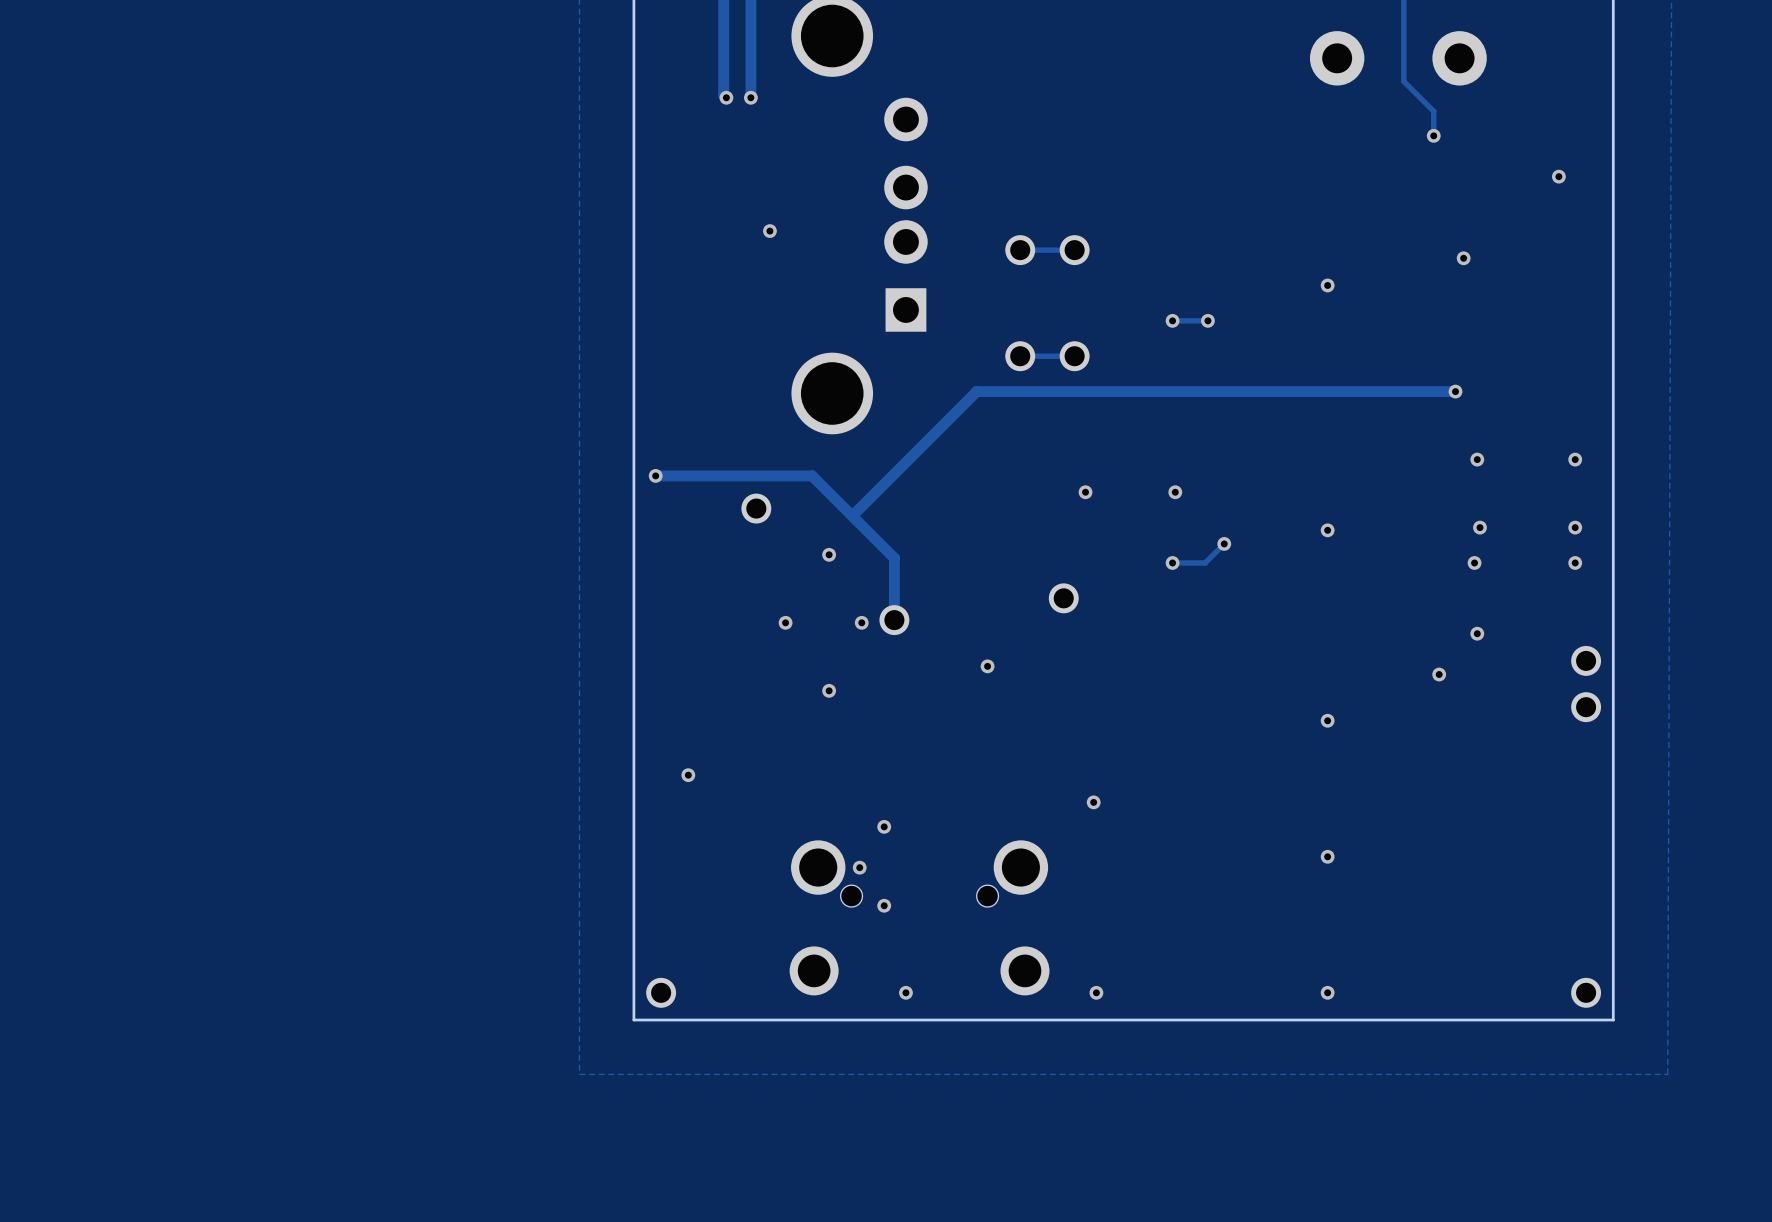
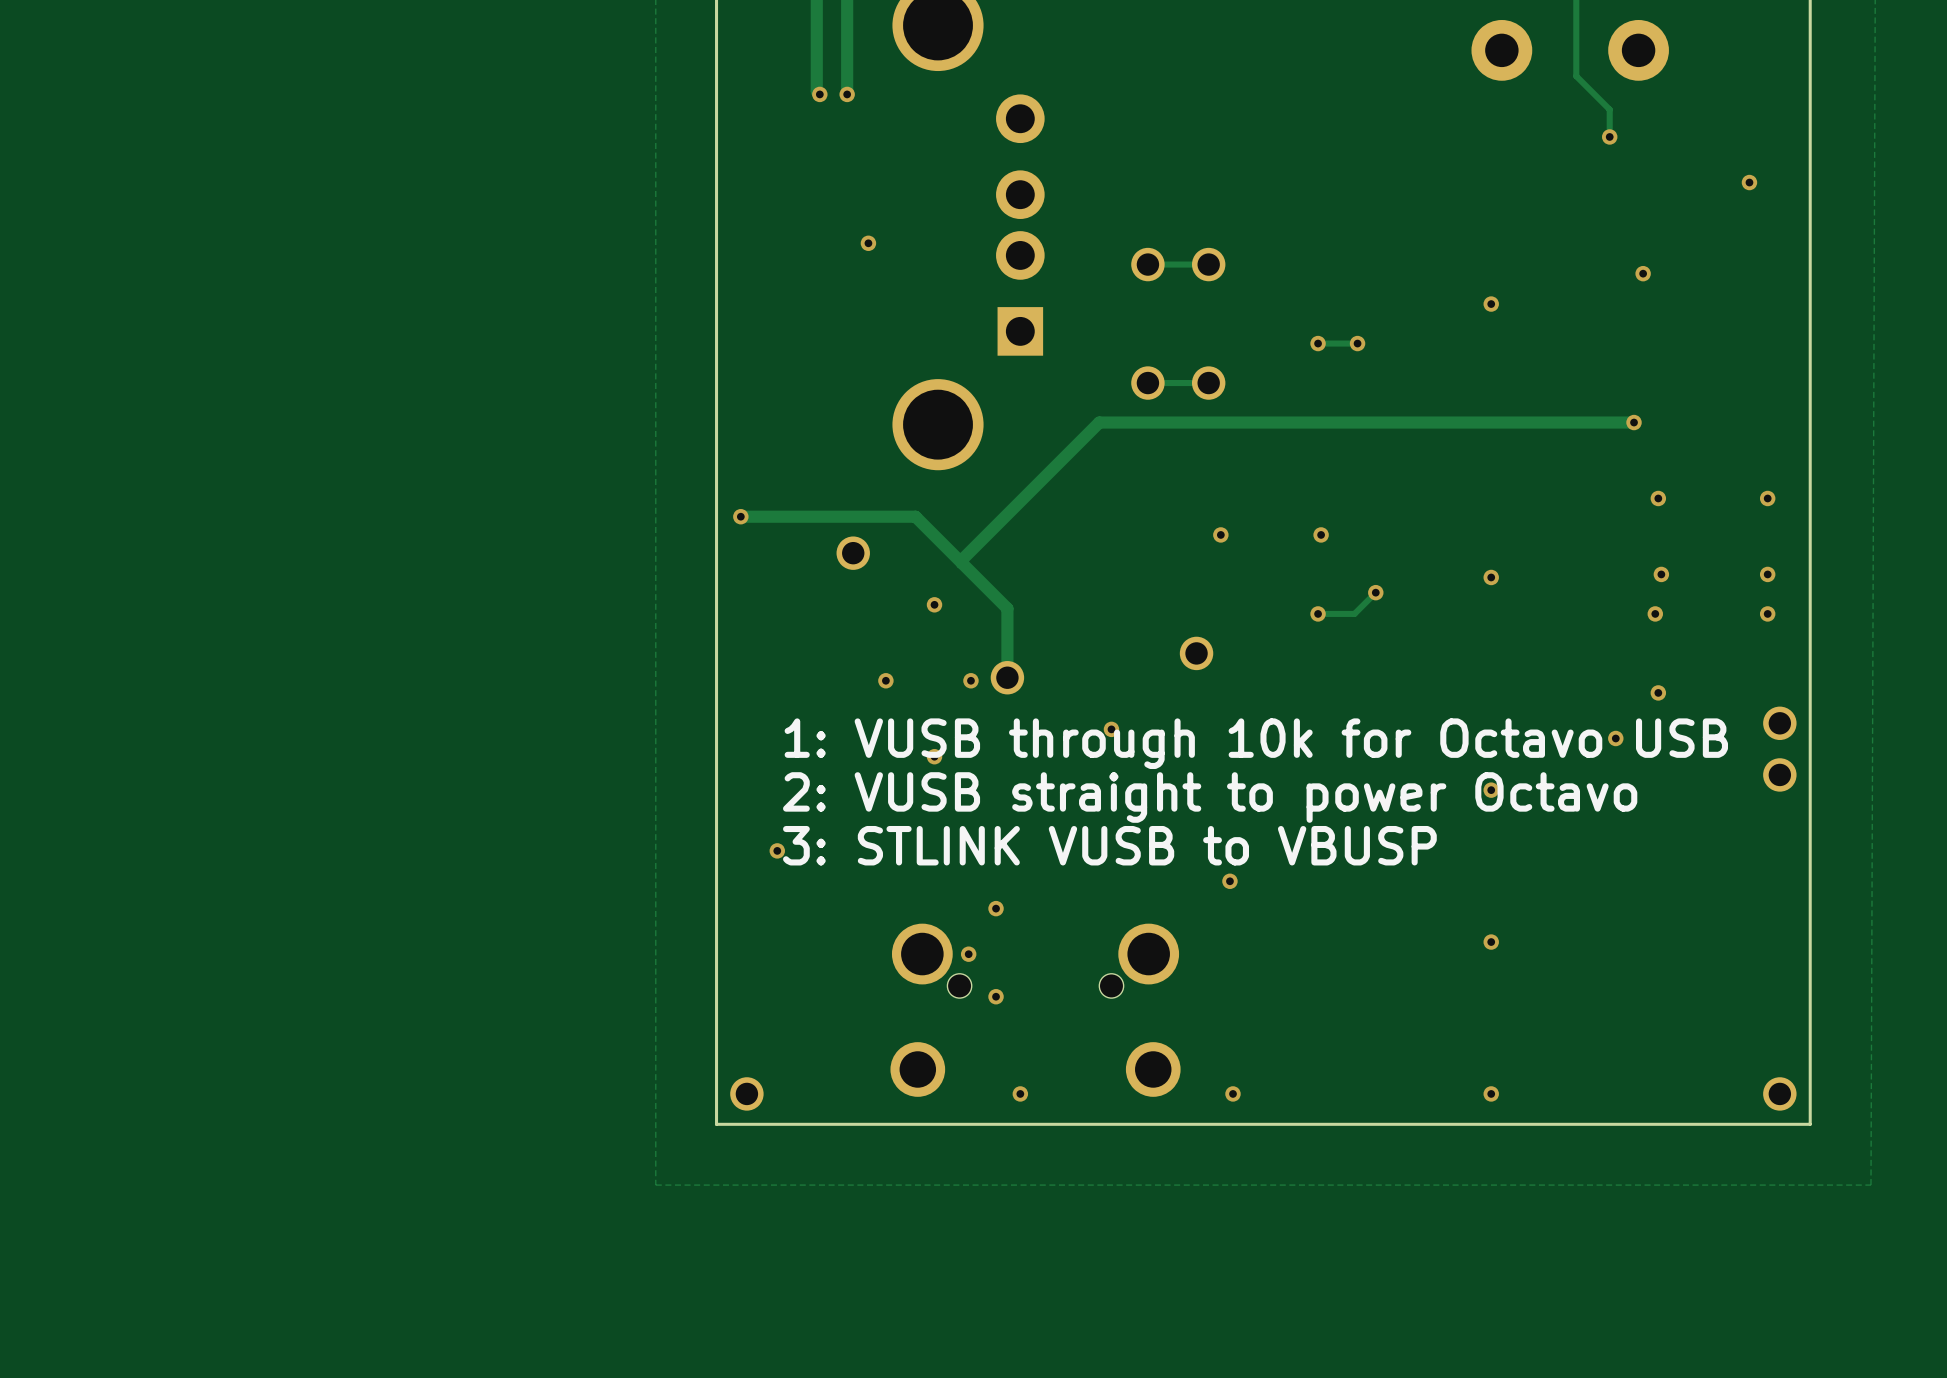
text: none -> 1: VUSB through 10k for Octavo USB (1256, 743)
text: none -> 2: VUSB straight to power Octavo (1210, 797)
text: none -> 3: STLINK VUSB to VBUSP (1109, 845)

